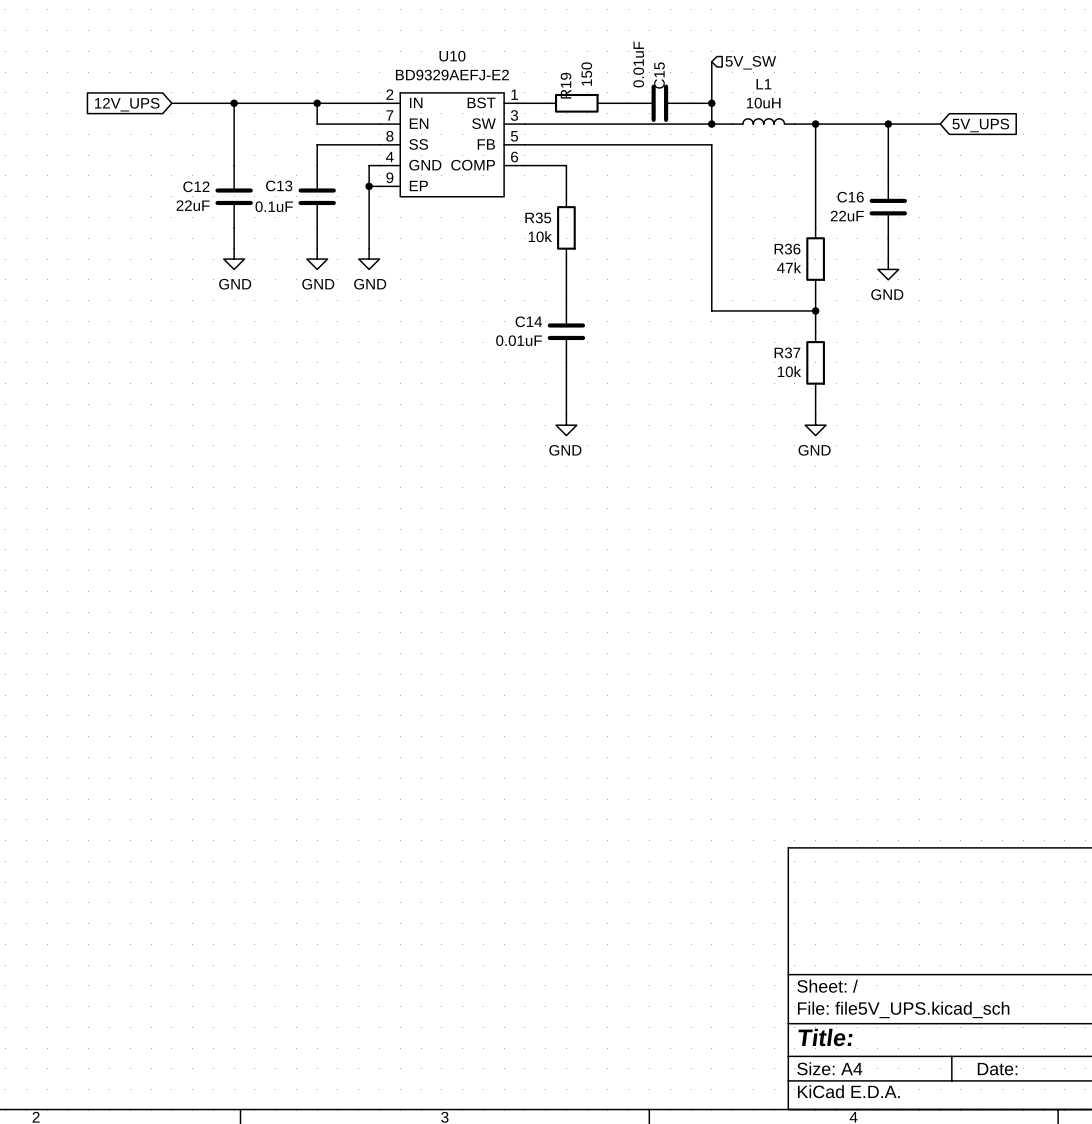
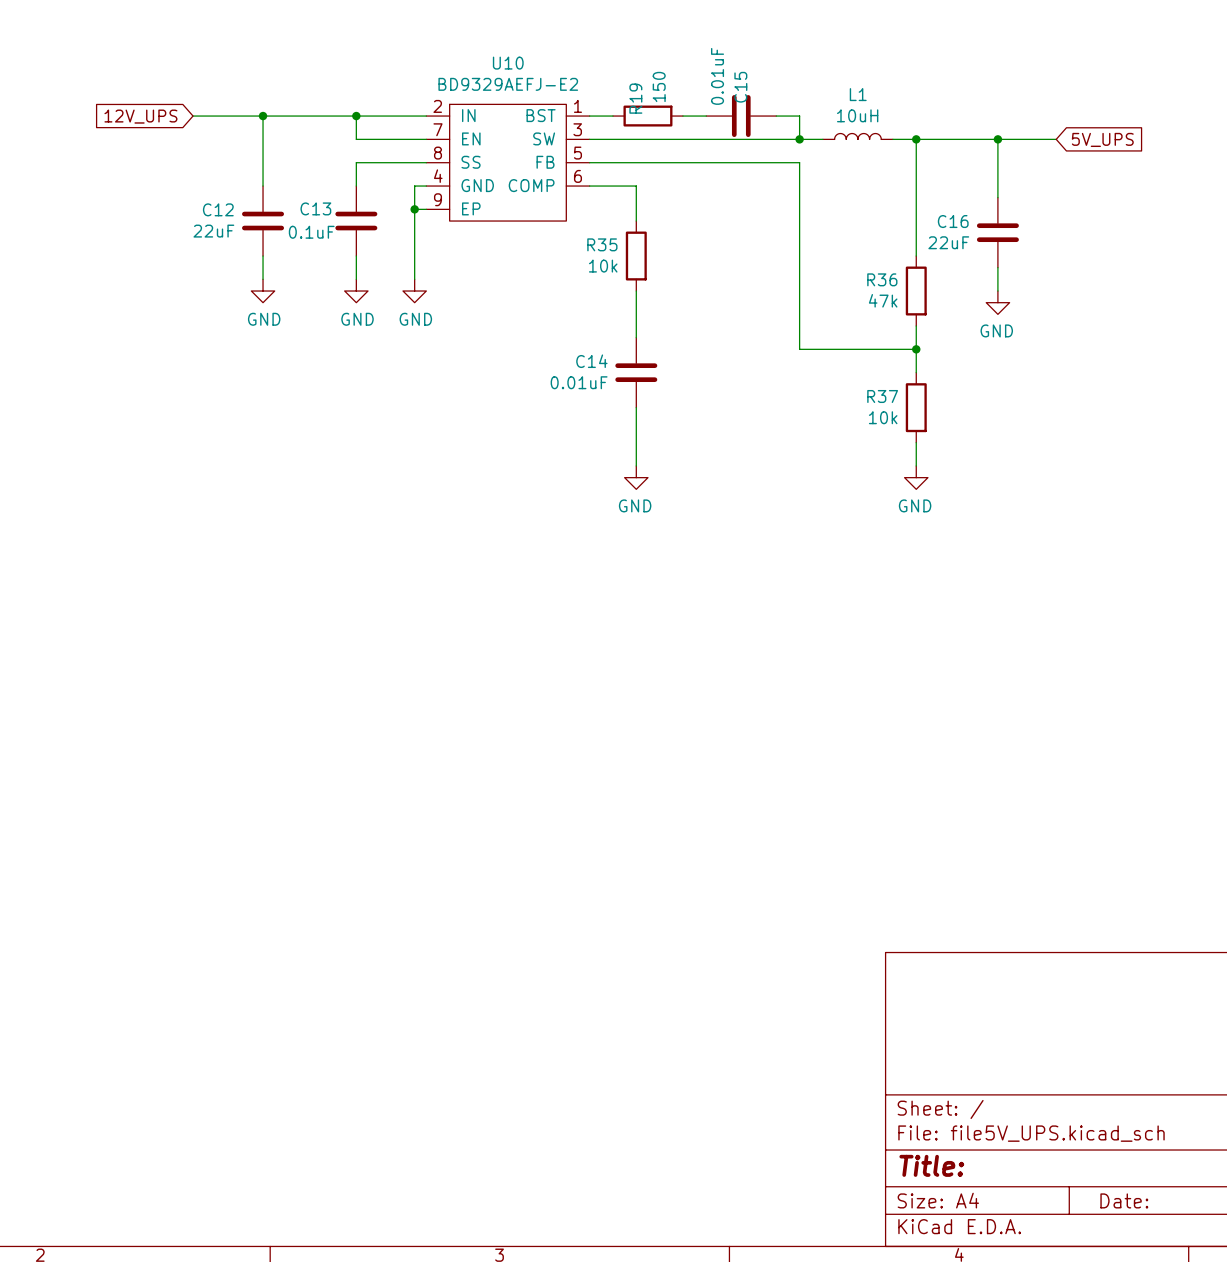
wire: (711, 61) (711, 103) -> none
hierarchical label: 5V_SW (750, 62) -> none
junction: (711, 103) -> none

